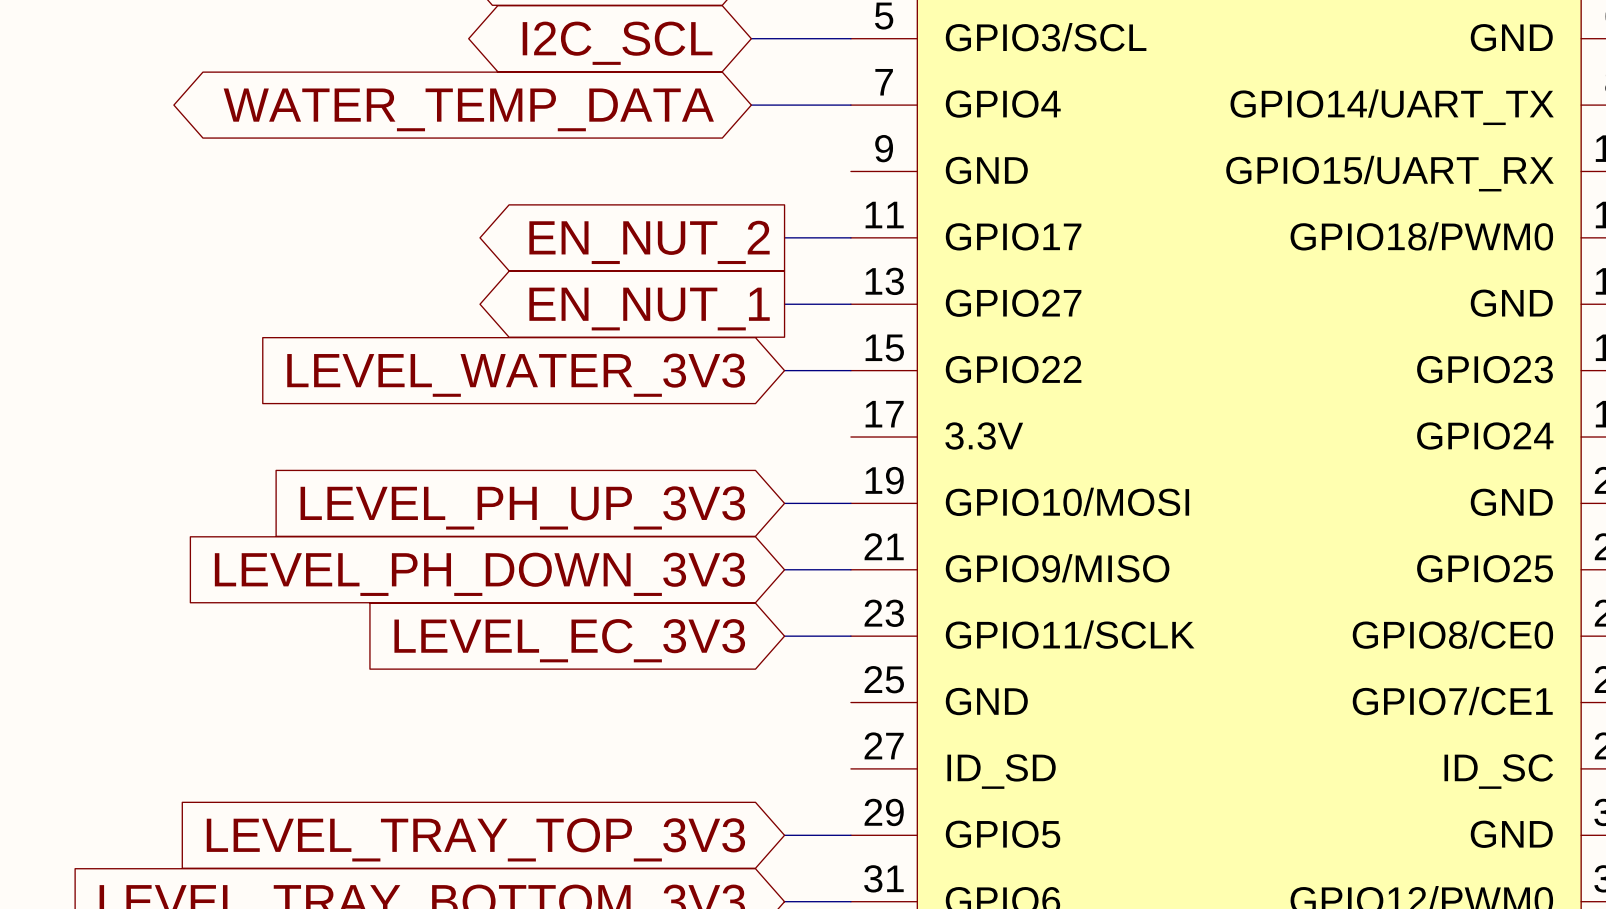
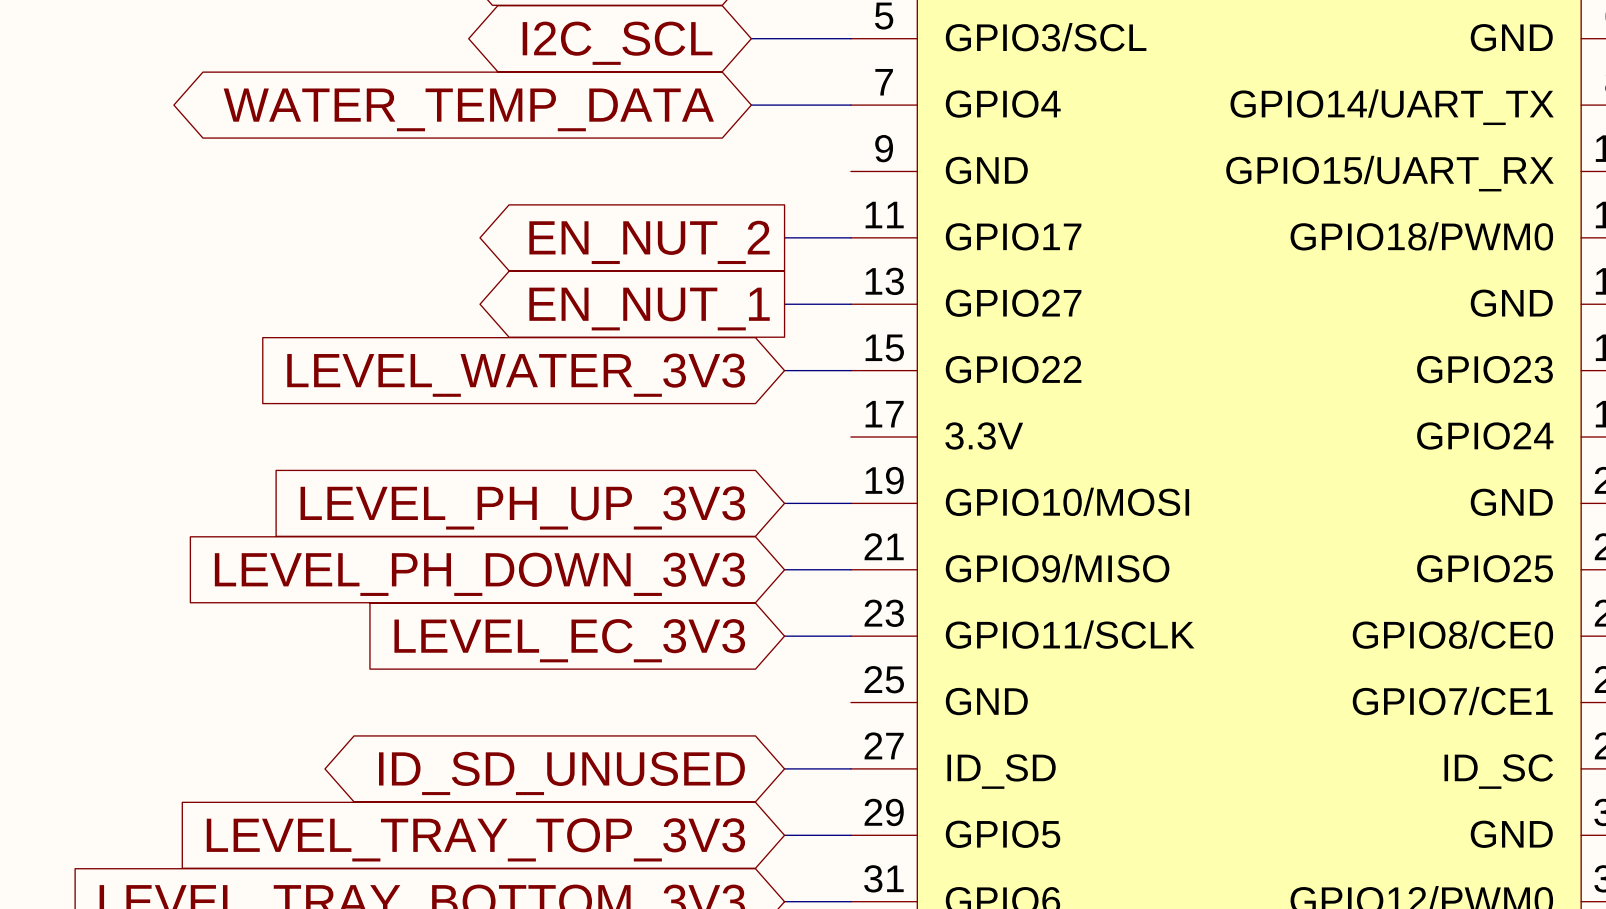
wire: none -> (784, 768) (850, 768)
global label: none -> ID_SD_UNUSED (561, 773)

